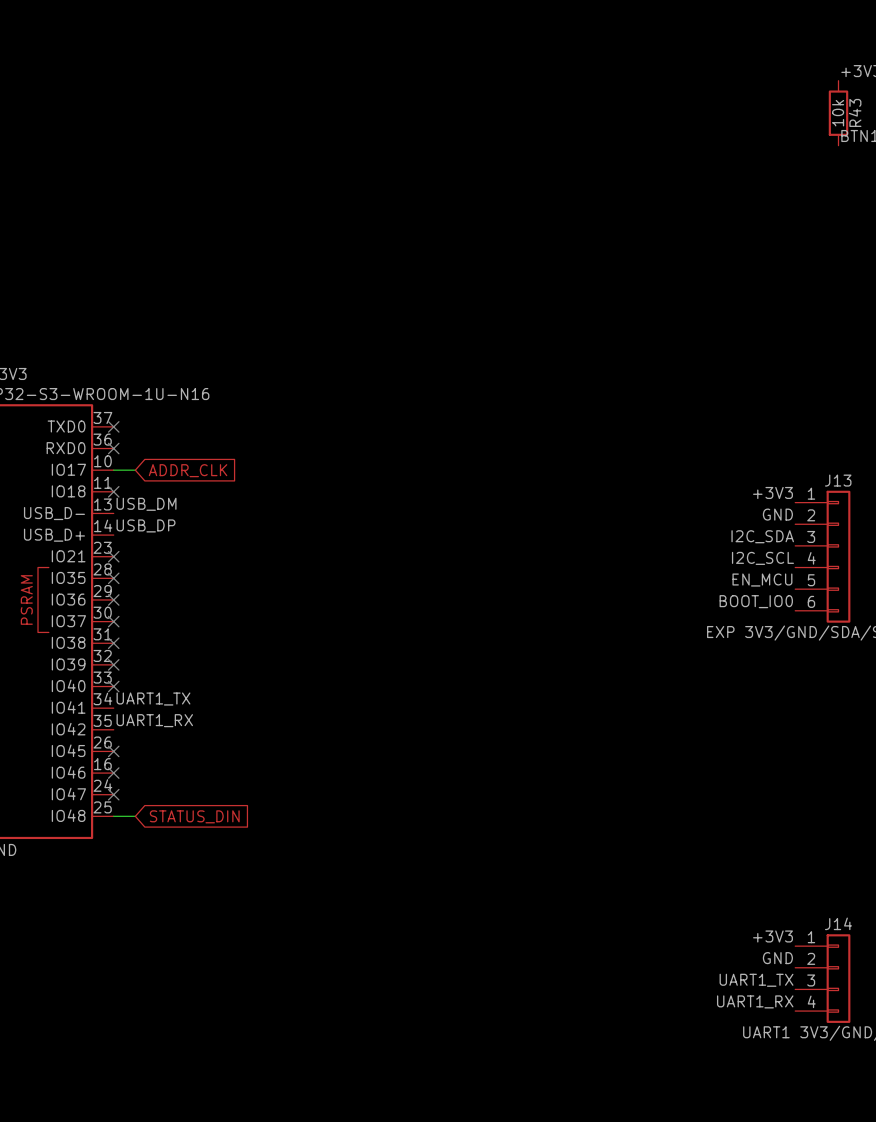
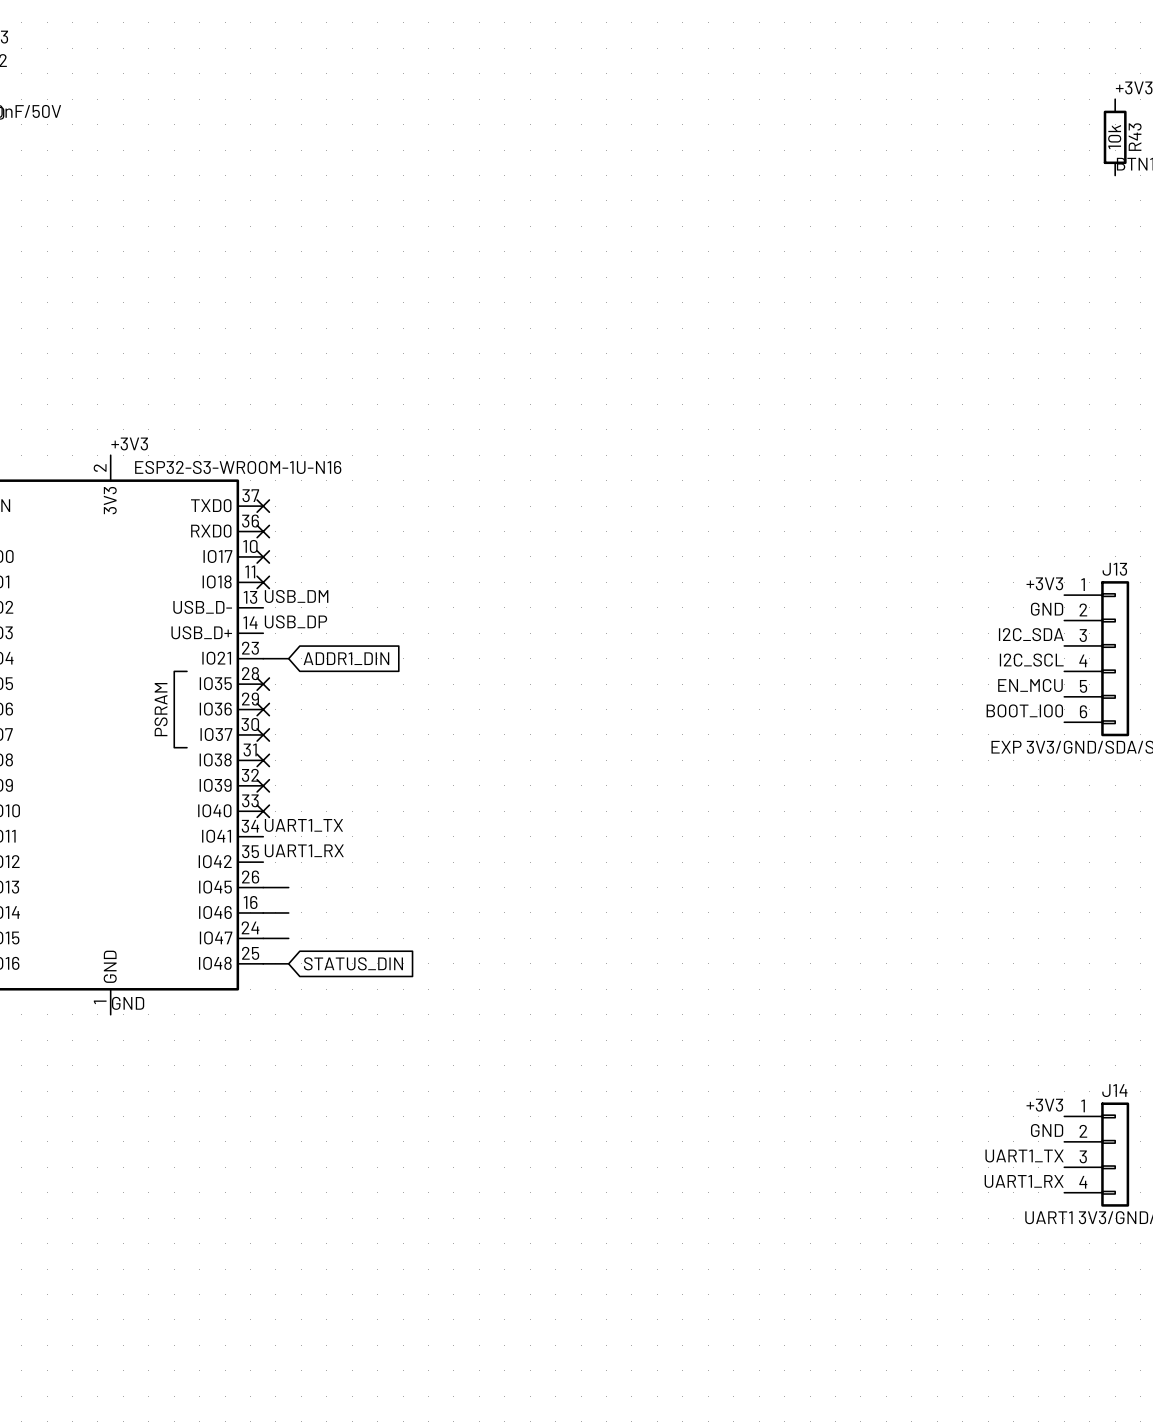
wire: (113, 470) (135, 470) -> (263, 658) (288, 658)
no-connect mark: none -> (263, 556)
global label: ADDR_CLK (188, 470) -> none
no-connect mark: (113, 556) -> none
global label: none -> ADDR1_DIN (346, 658)
wire: none -> (263, 887) (288, 887)
no-connect mark: (113, 751) -> none
wire: none -> (263, 912) (288, 912)
no-connect mark: (113, 773) -> none
wire: none -> (263, 938) (288, 938)
no-connect mark: (113, 794) -> none

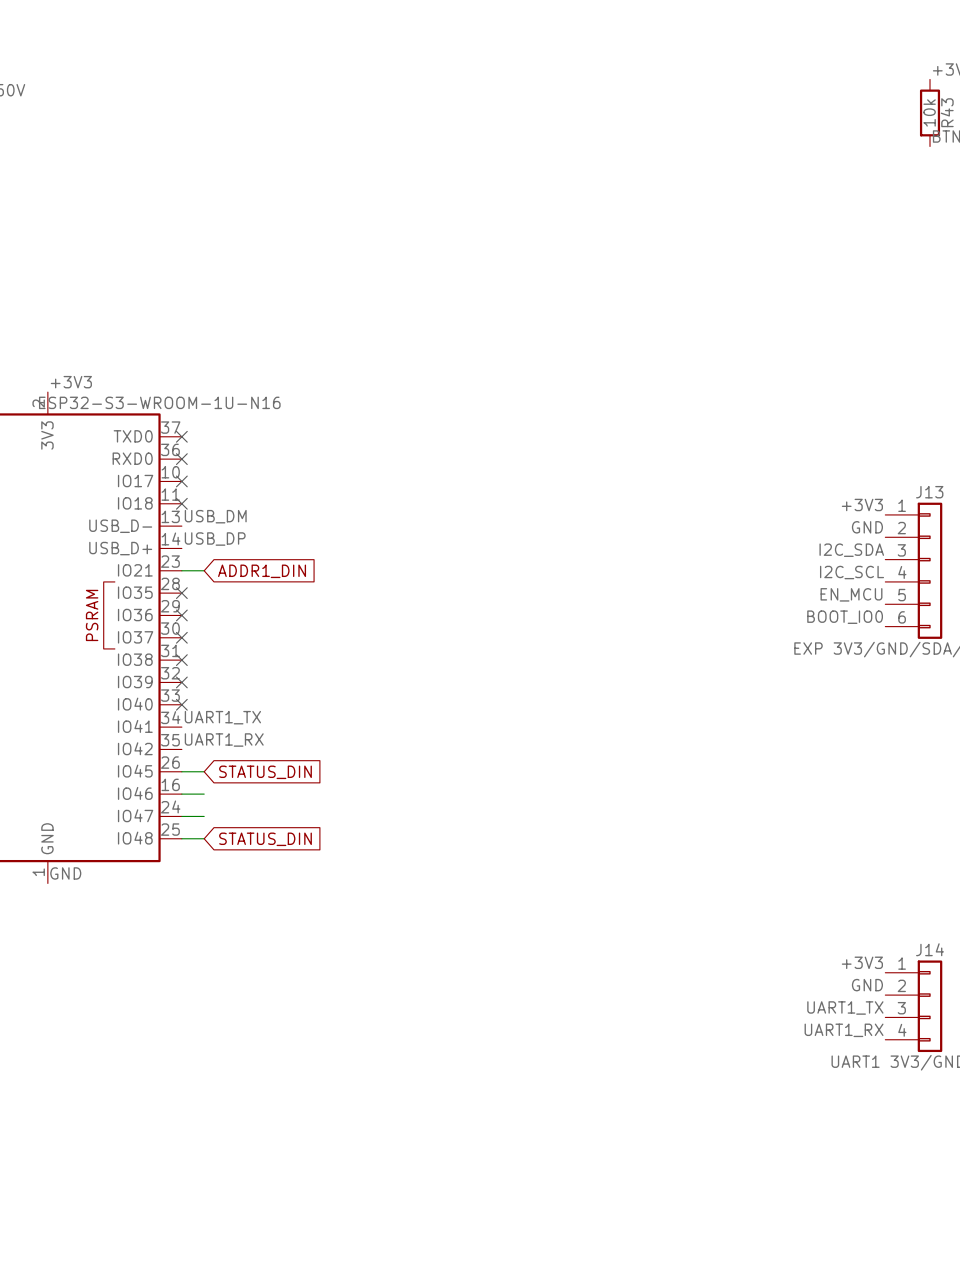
global label: none -> STATUS_DIN (265, 772)

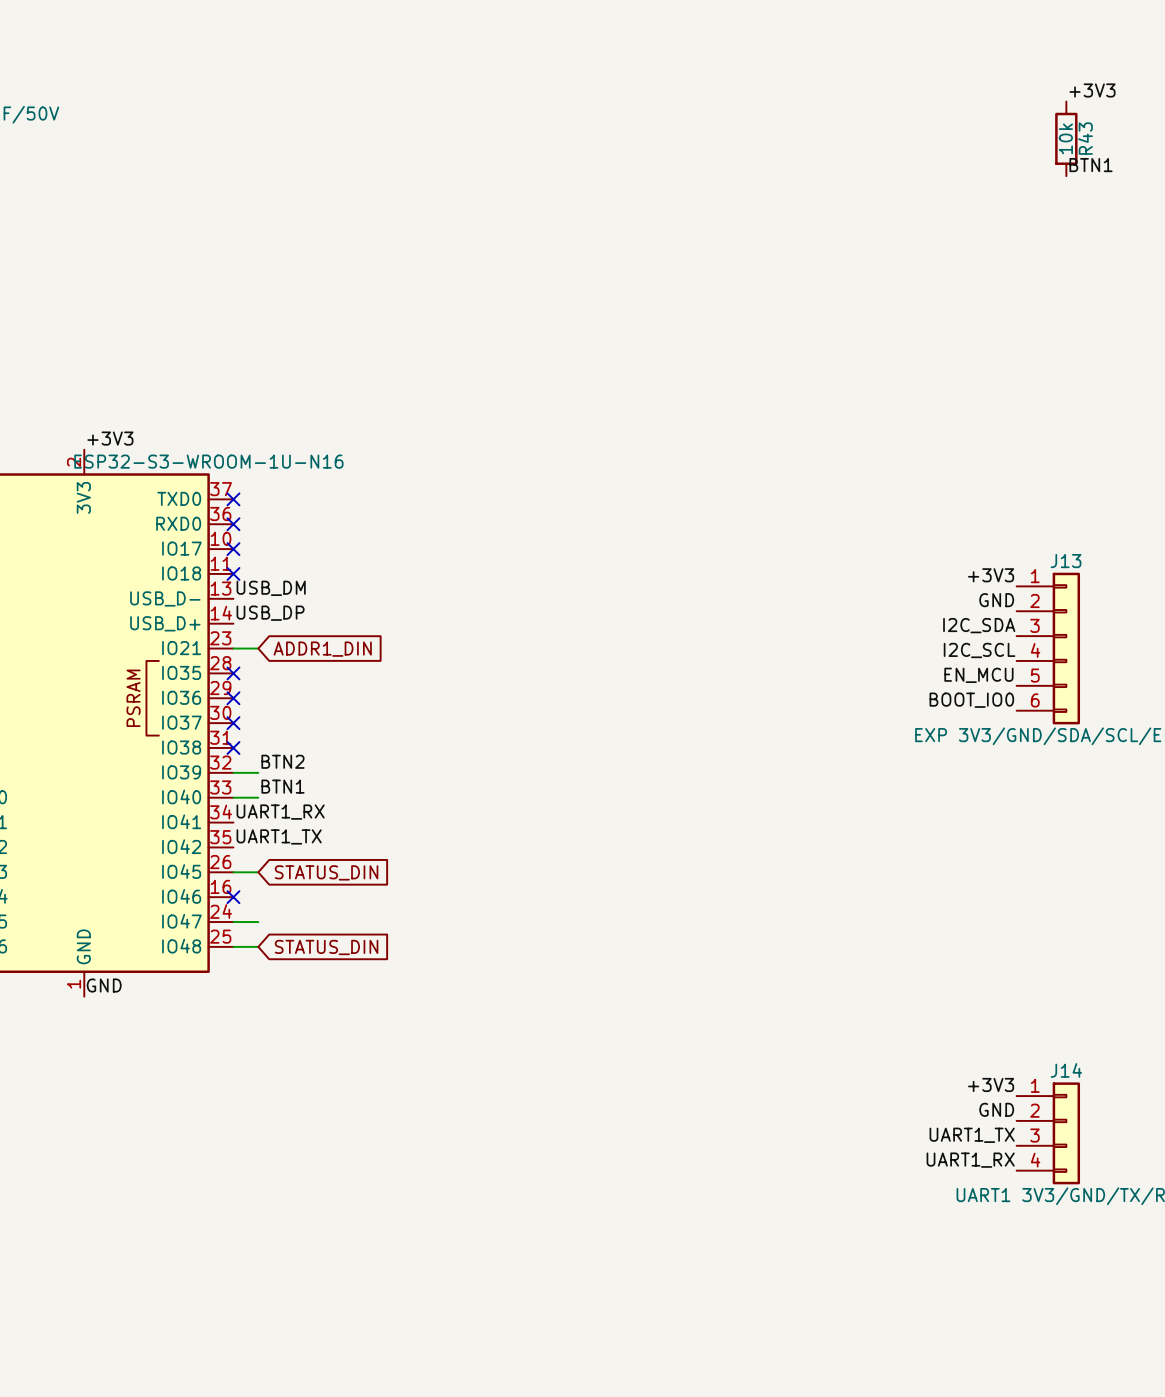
label: none -> BTN2 (282, 761)
wire: none -> (233, 772) (258, 772)
no-connect mark: (181, 682) -> none
label: none -> BTN1 (282, 786)
no-connect mark: (181, 704) -> none
label: UART1_TX (222, 717) -> UART1_RX (280, 812)
label: UART1_RX (224, 740) -> UART1_TX (279, 836)
wire: (181, 794) (204, 794) -> (233, 797) (258, 797)
no-connect mark: none -> (233, 897)

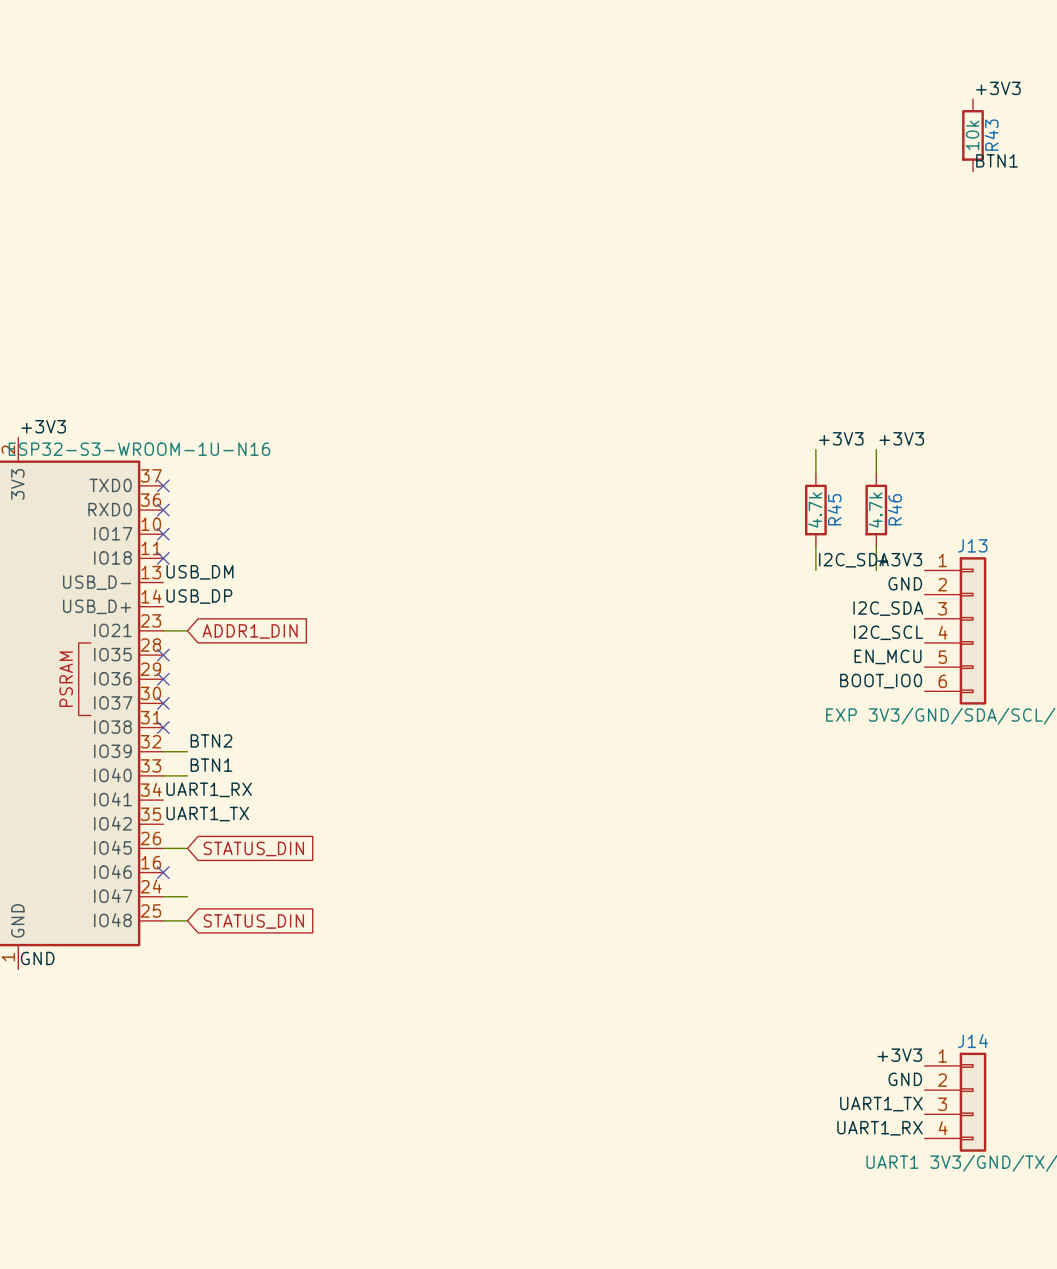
label: none -> +3V3 (841, 438)
label: none -> +3V3 (901, 438)
wire: none -> (815, 449) (815, 473)
wire: none -> (876, 449) (876, 473)
R45: none -> 4.7k (815, 510)
R46: none -> 4.7k (876, 510)
wire: none -> (815, 546) (815, 570)
wire: none -> (876, 546) (876, 570)
label: none -> I2C_SDA (853, 560)

